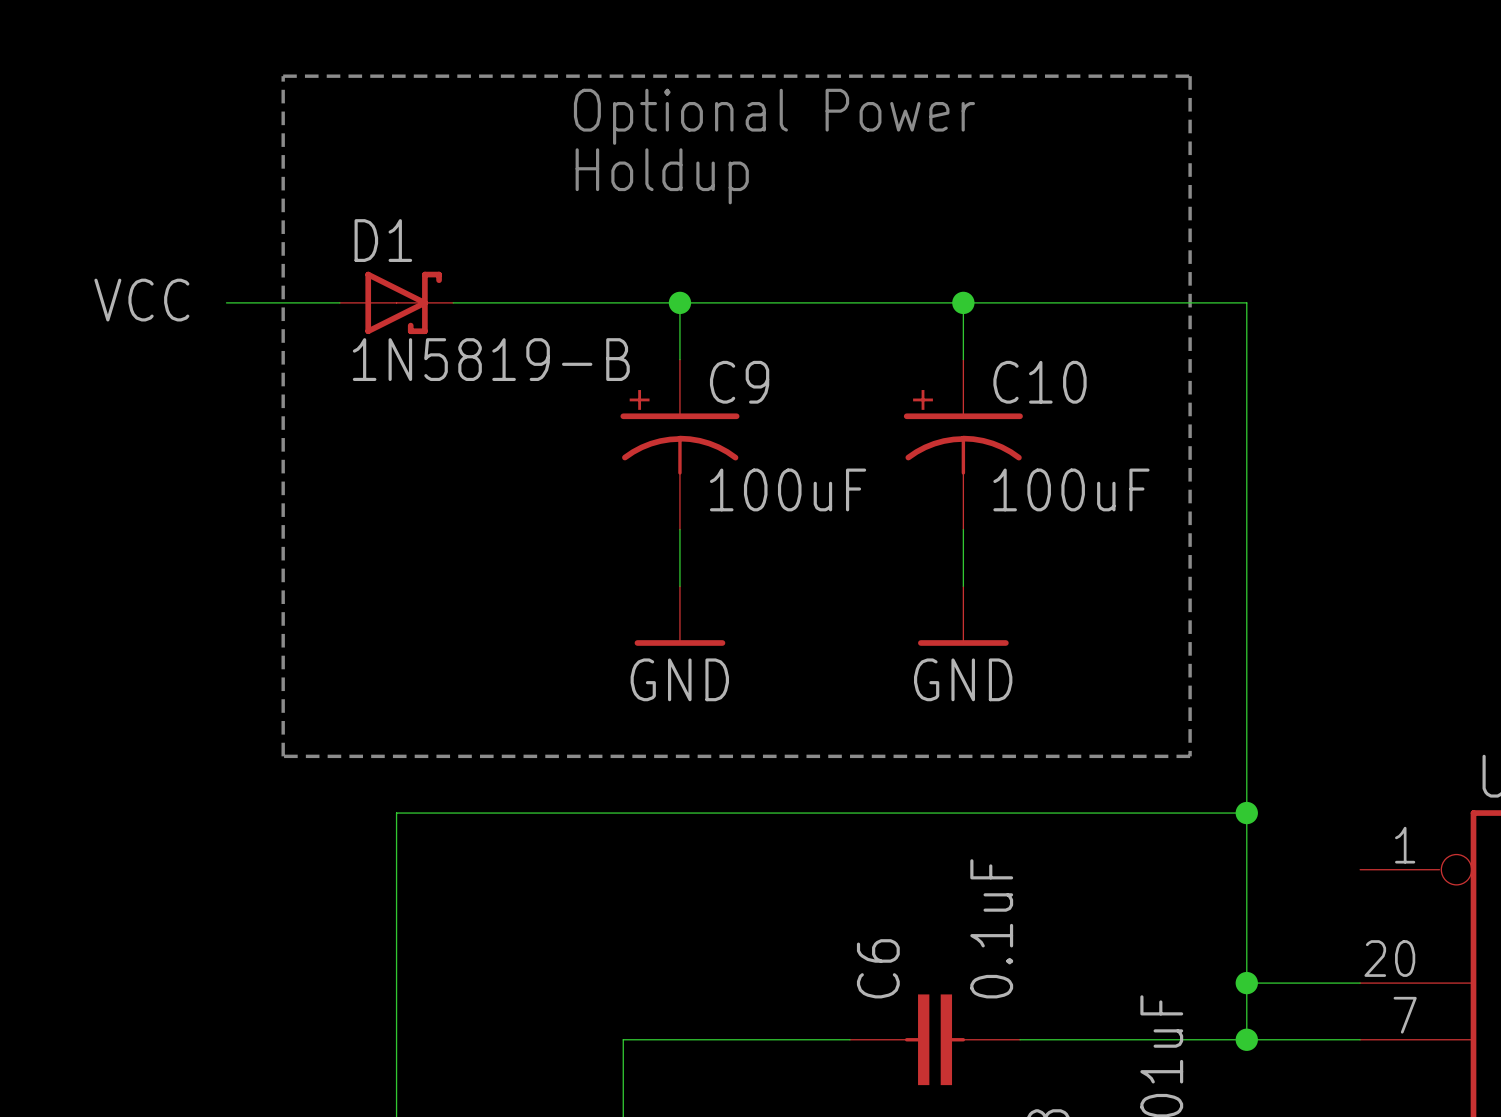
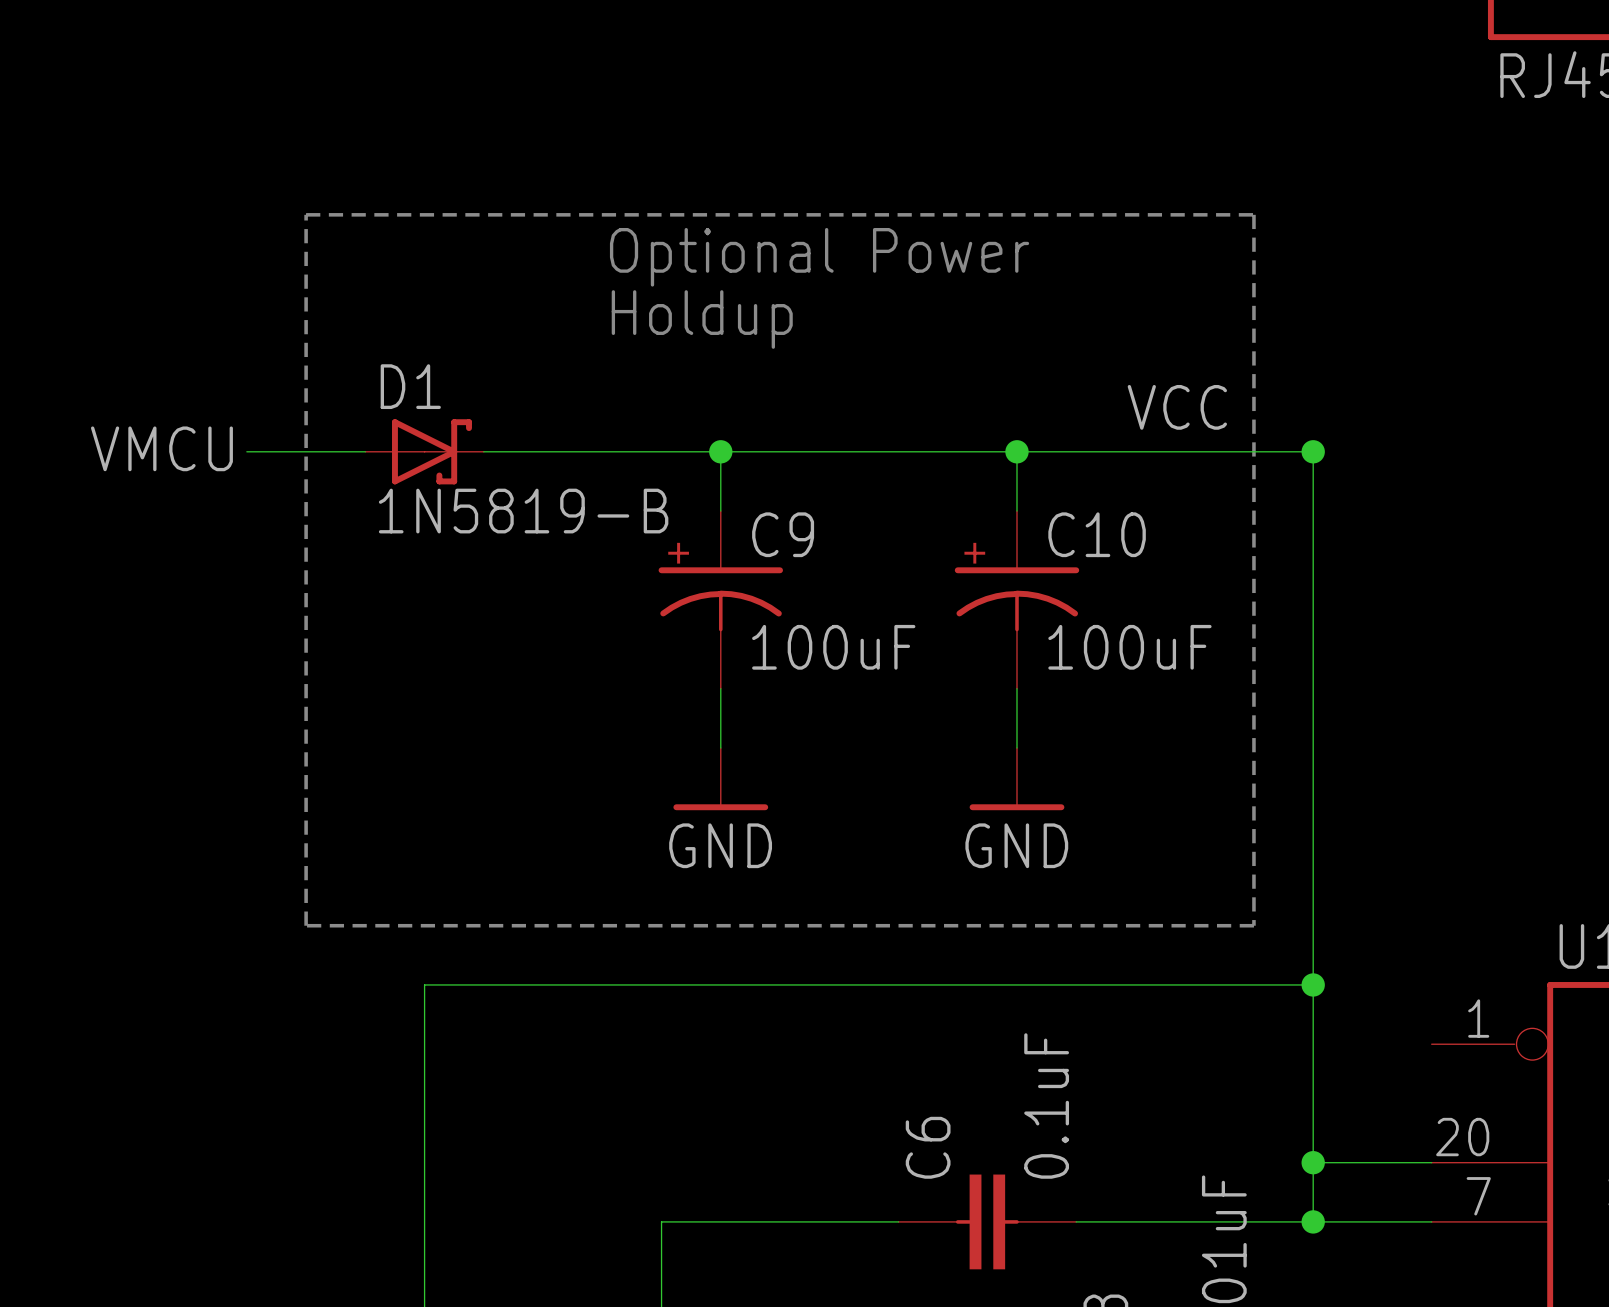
label: none -> VCC (1177, 407)
label: VCC (141, 300) -> VMCU (161, 448)
junction: none -> (1313, 451)

